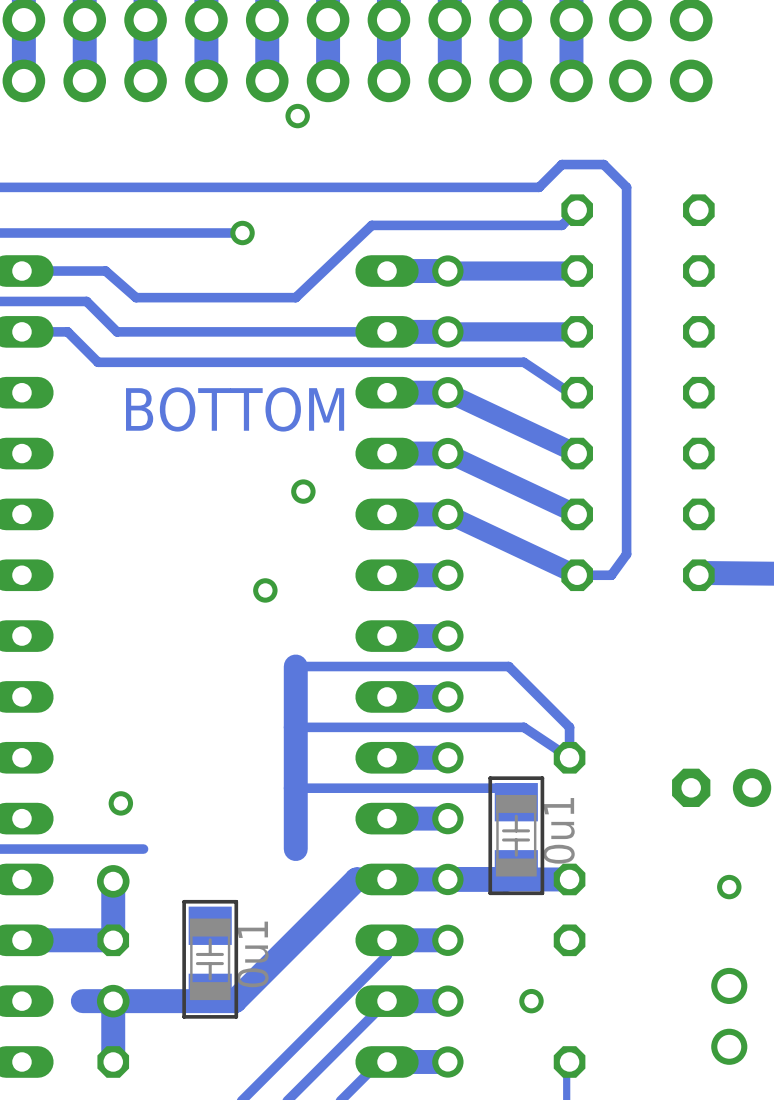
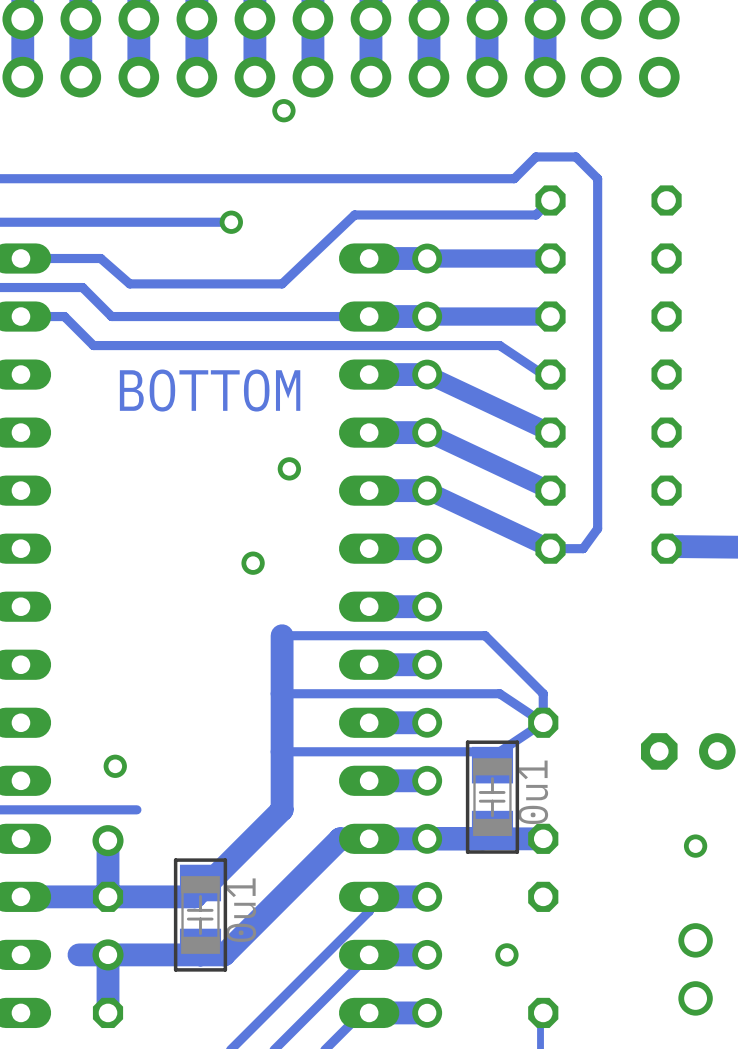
track: none -> (543, 722) (499, 751)
track: none -> (282, 809) (195, 896) (108, 896)

